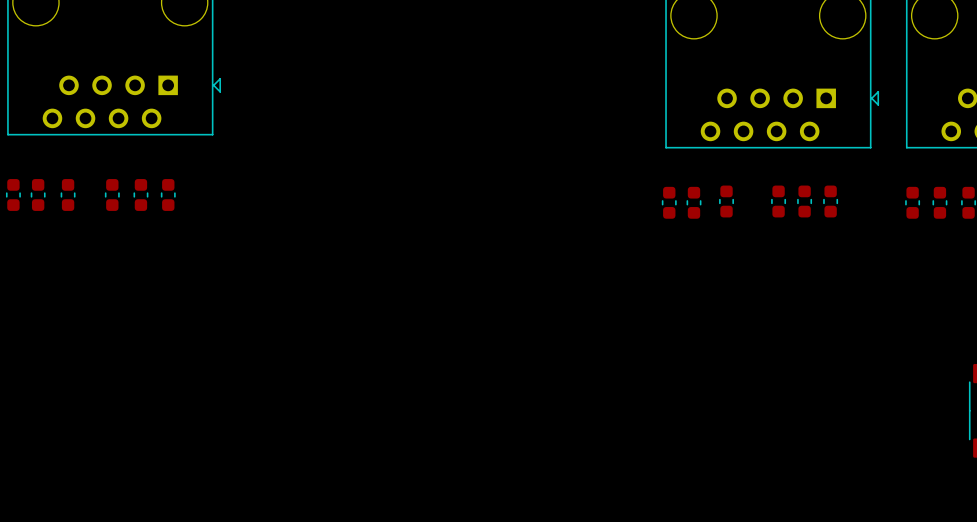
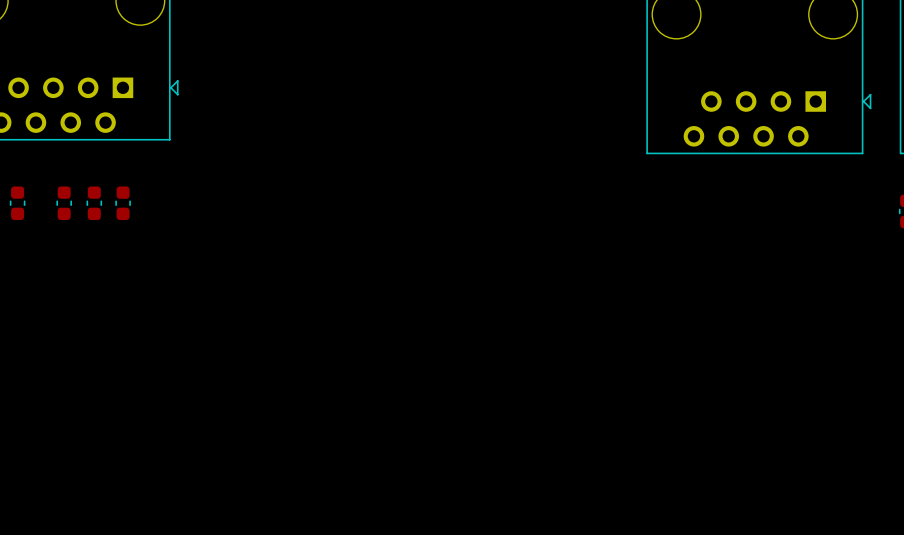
part: (726, 201) -> none
part: (778, 201) -> none
part: (804, 201) -> none
part: (830, 201) -> none
part: (669, 202) -> none
part: (693, 202) -> none

